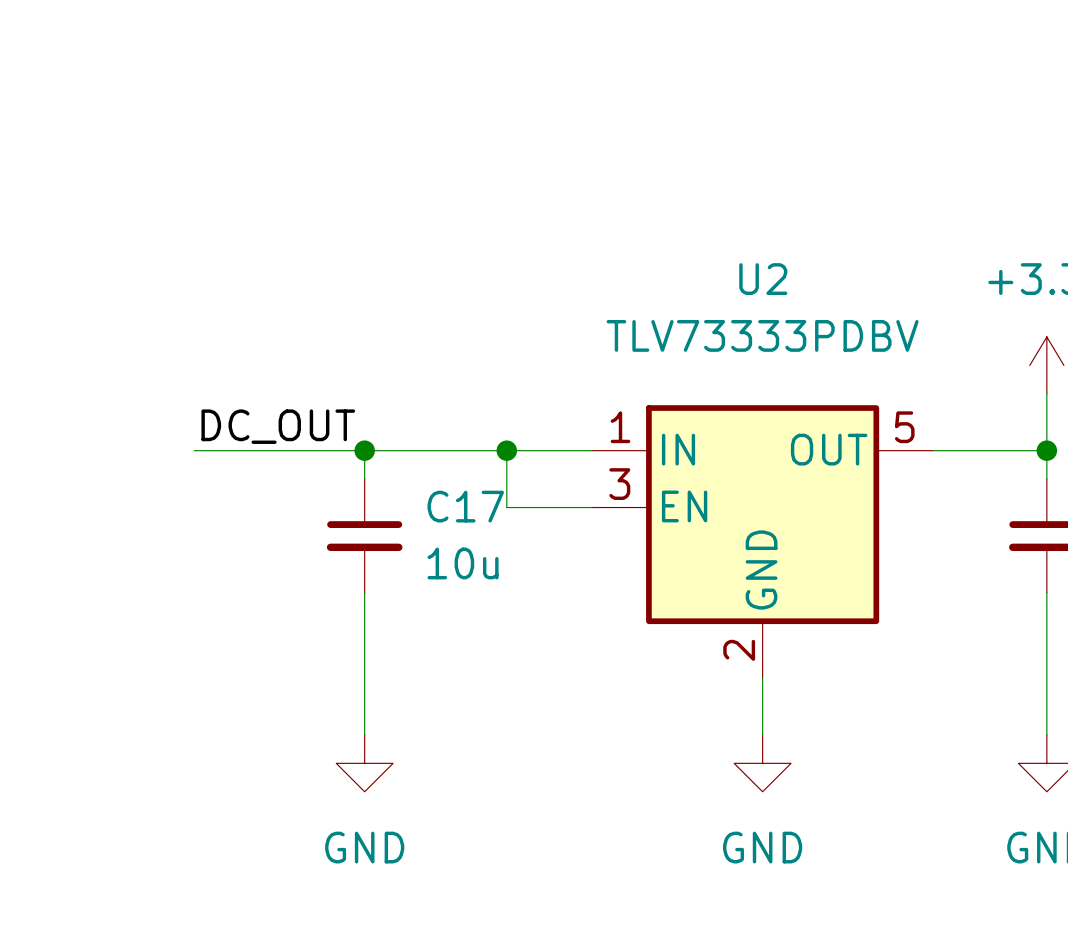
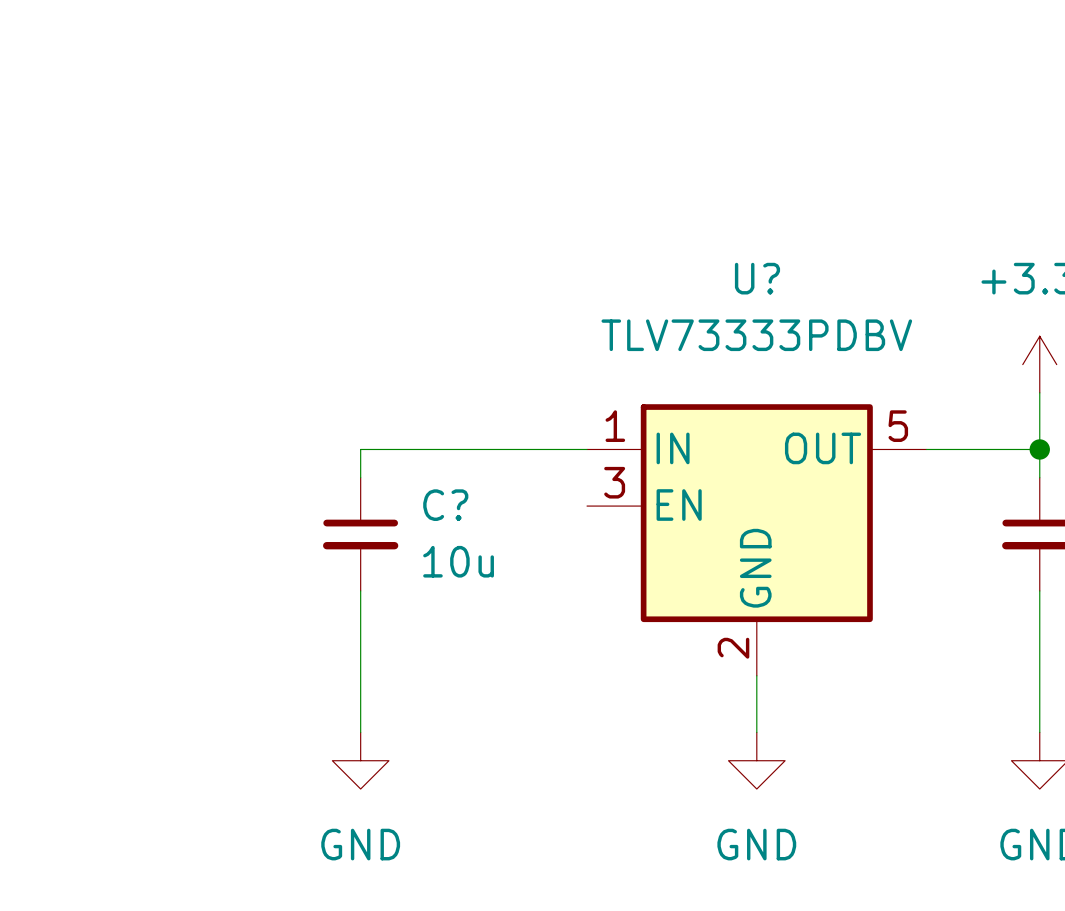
U2 name: U2 (763, 279) -> U? (757, 278)
label: DC_OUT (278, 426) -> none
wire: (194, 450) (364, 450) -> none
junction: (364, 450) -> none
wire: (506, 450) (506, 507) (592, 507) -> none
junction: (506, 450) -> none
C17 name: C17 (465, 506) -> C? (445, 505)

